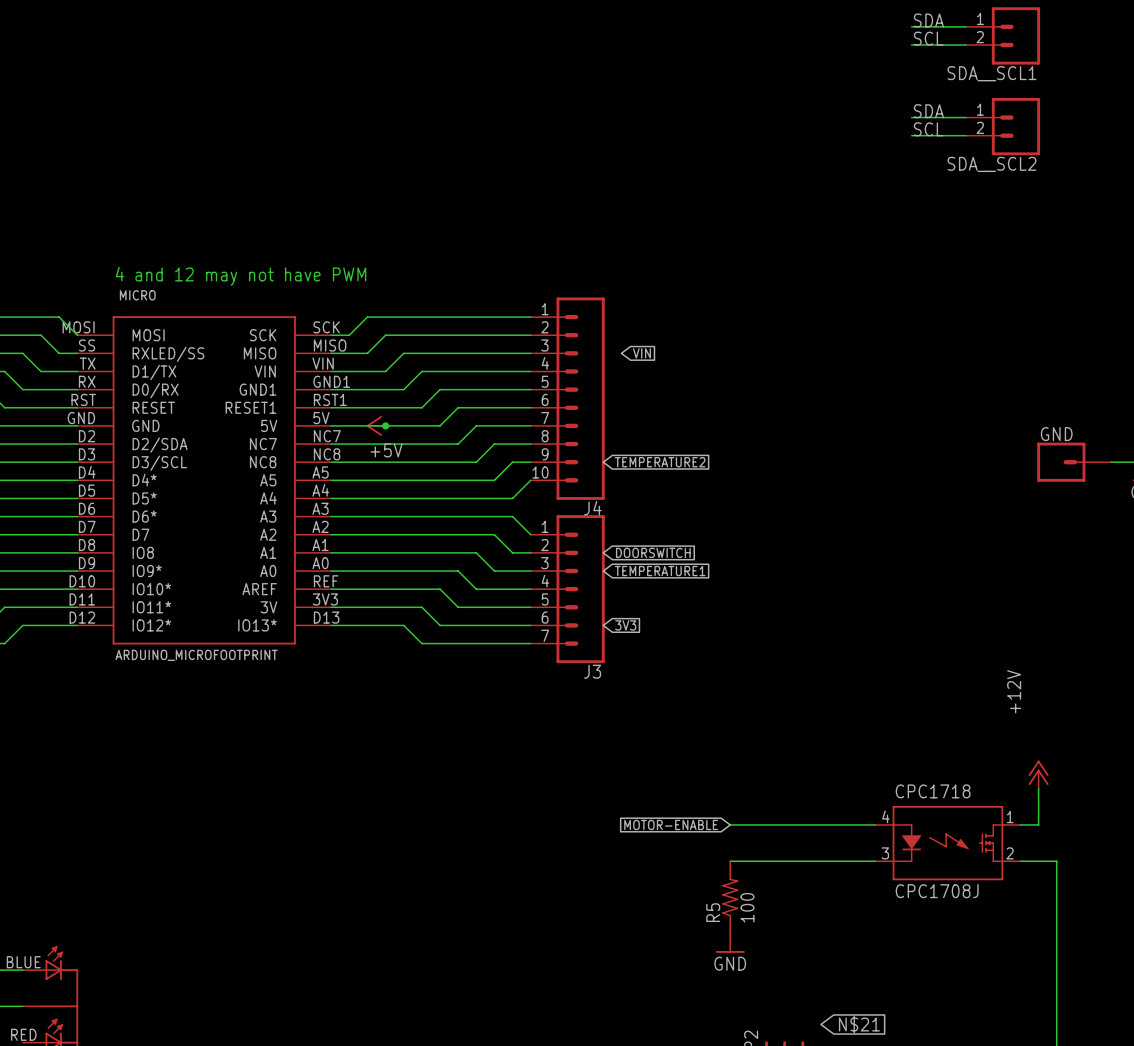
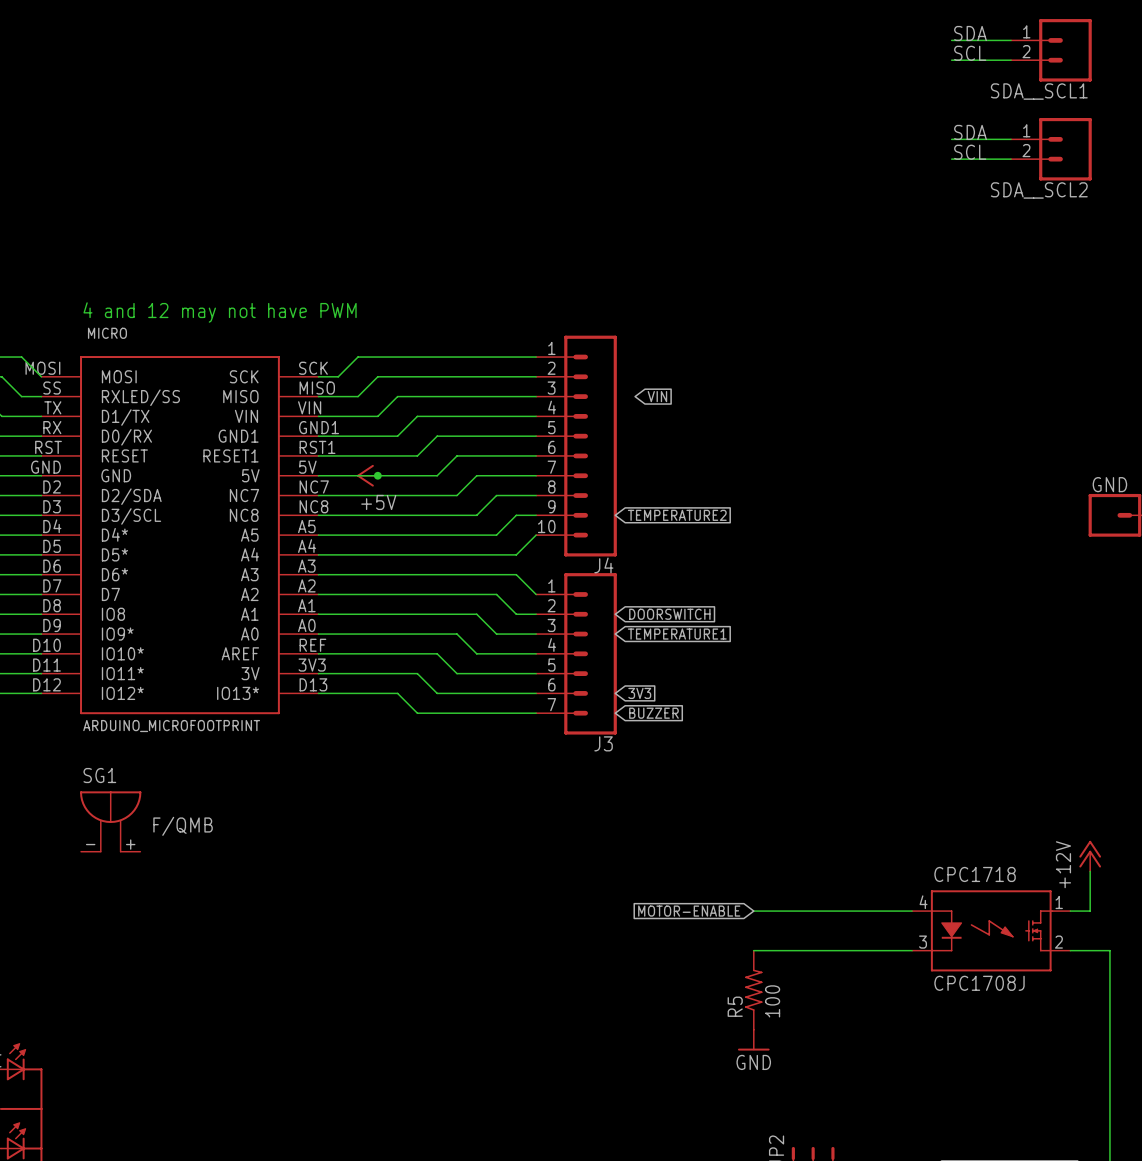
global label: none -> BUZZER (653, 713)
power symbol text position: +12V (1014, 691) -> +12V (1063, 864)
SG1: none -> F/QMB (110, 821)
global label: N$21 (859, 1024) -> none

